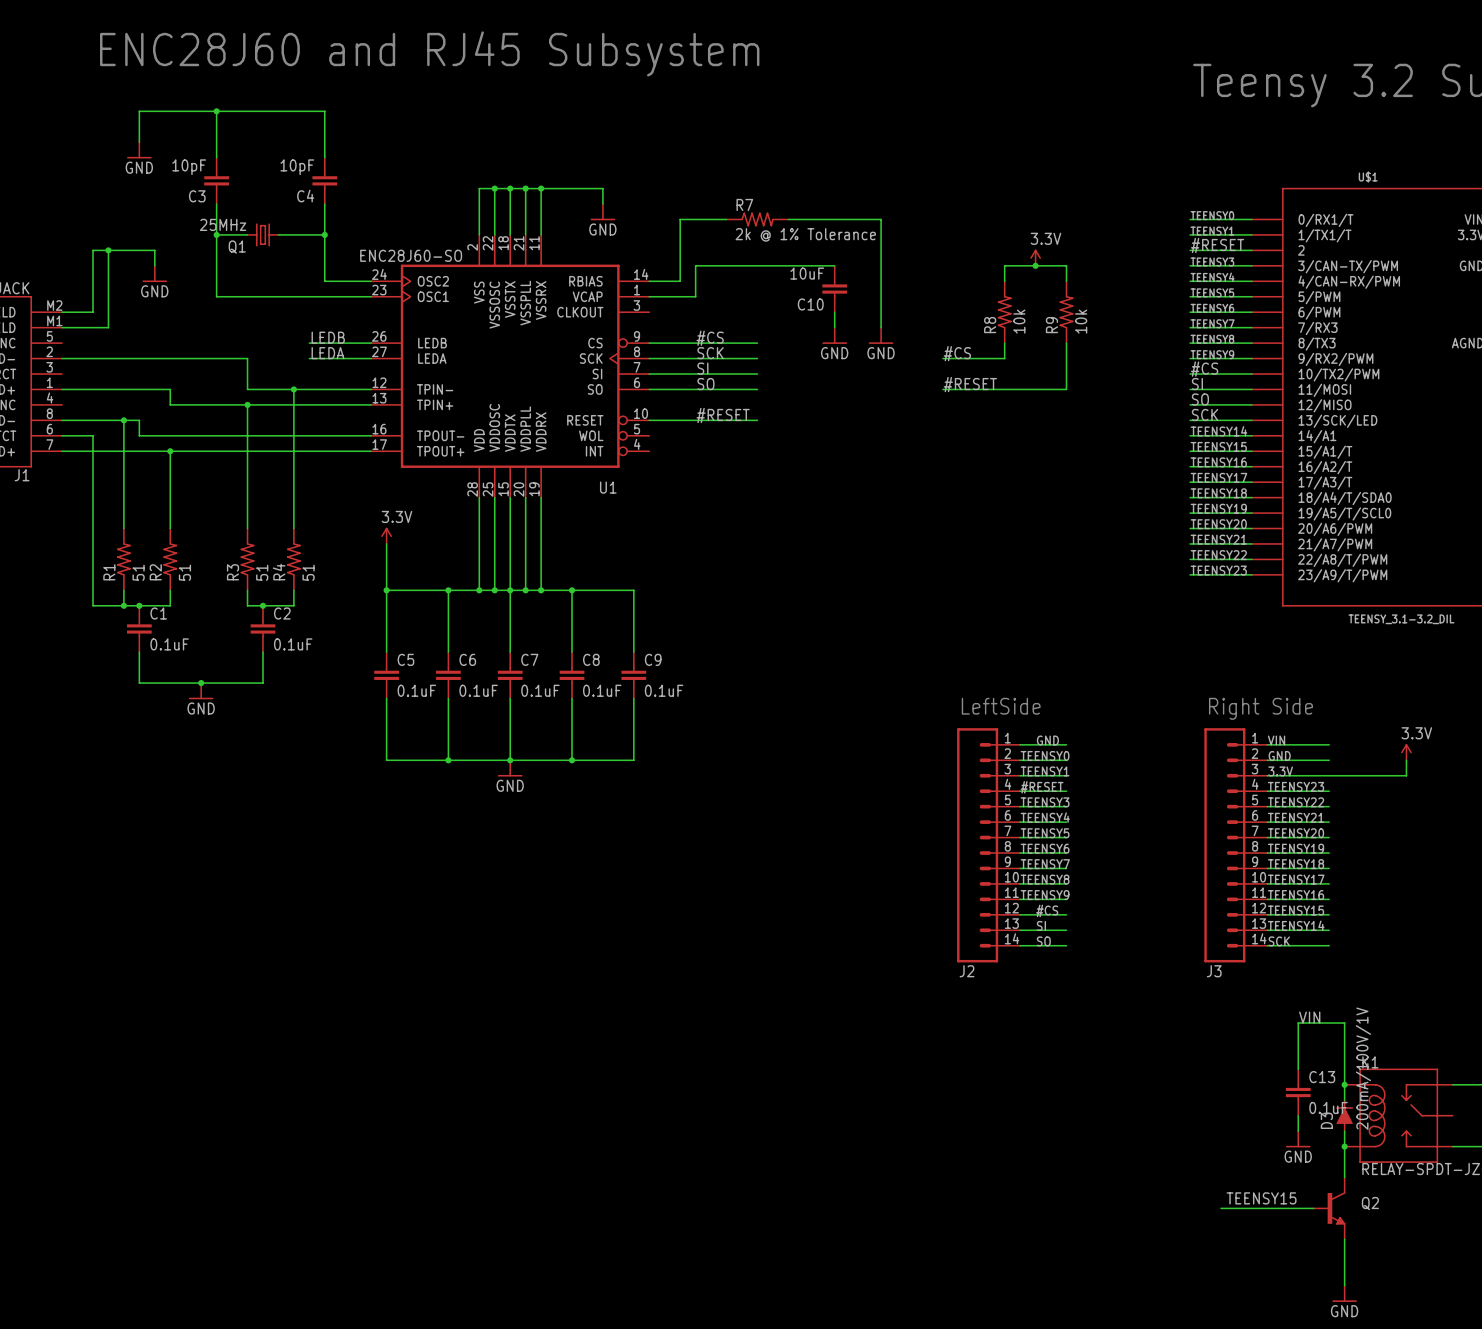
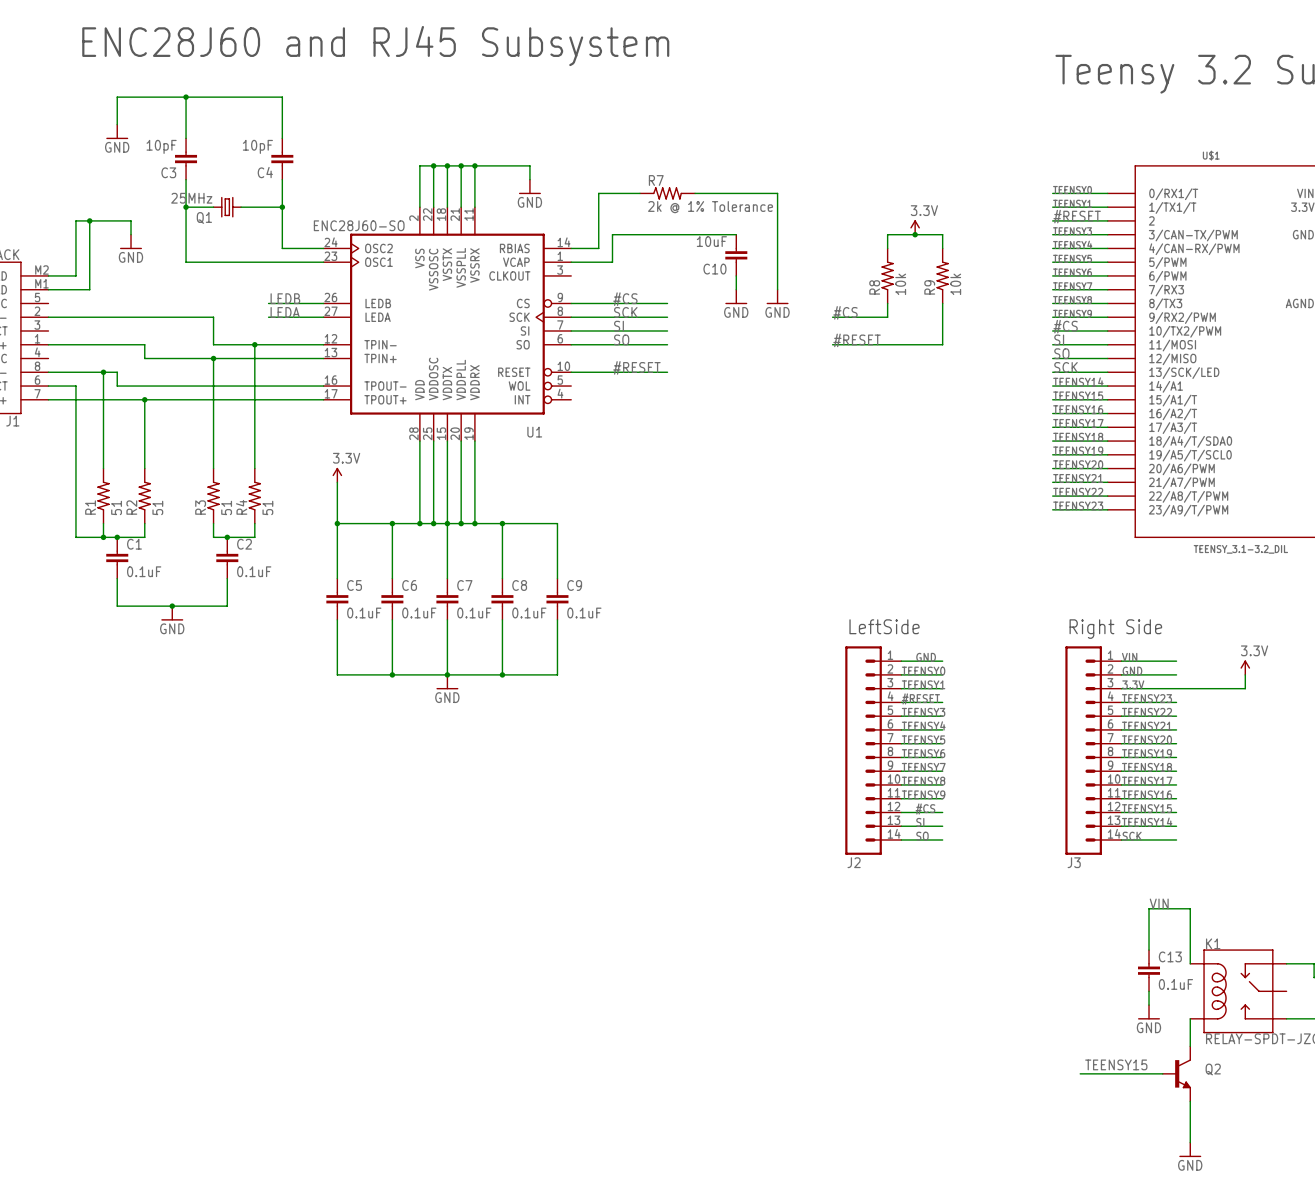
wire: (1344, 1084) (1344, 1100) -> none
junction: (1344, 1084) -> none
D3: 200mA/100V/1V (1344, 1115) -> none
wire: (1344, 1131) (1344, 1146) -> none
junction: (1344, 1146) -> none

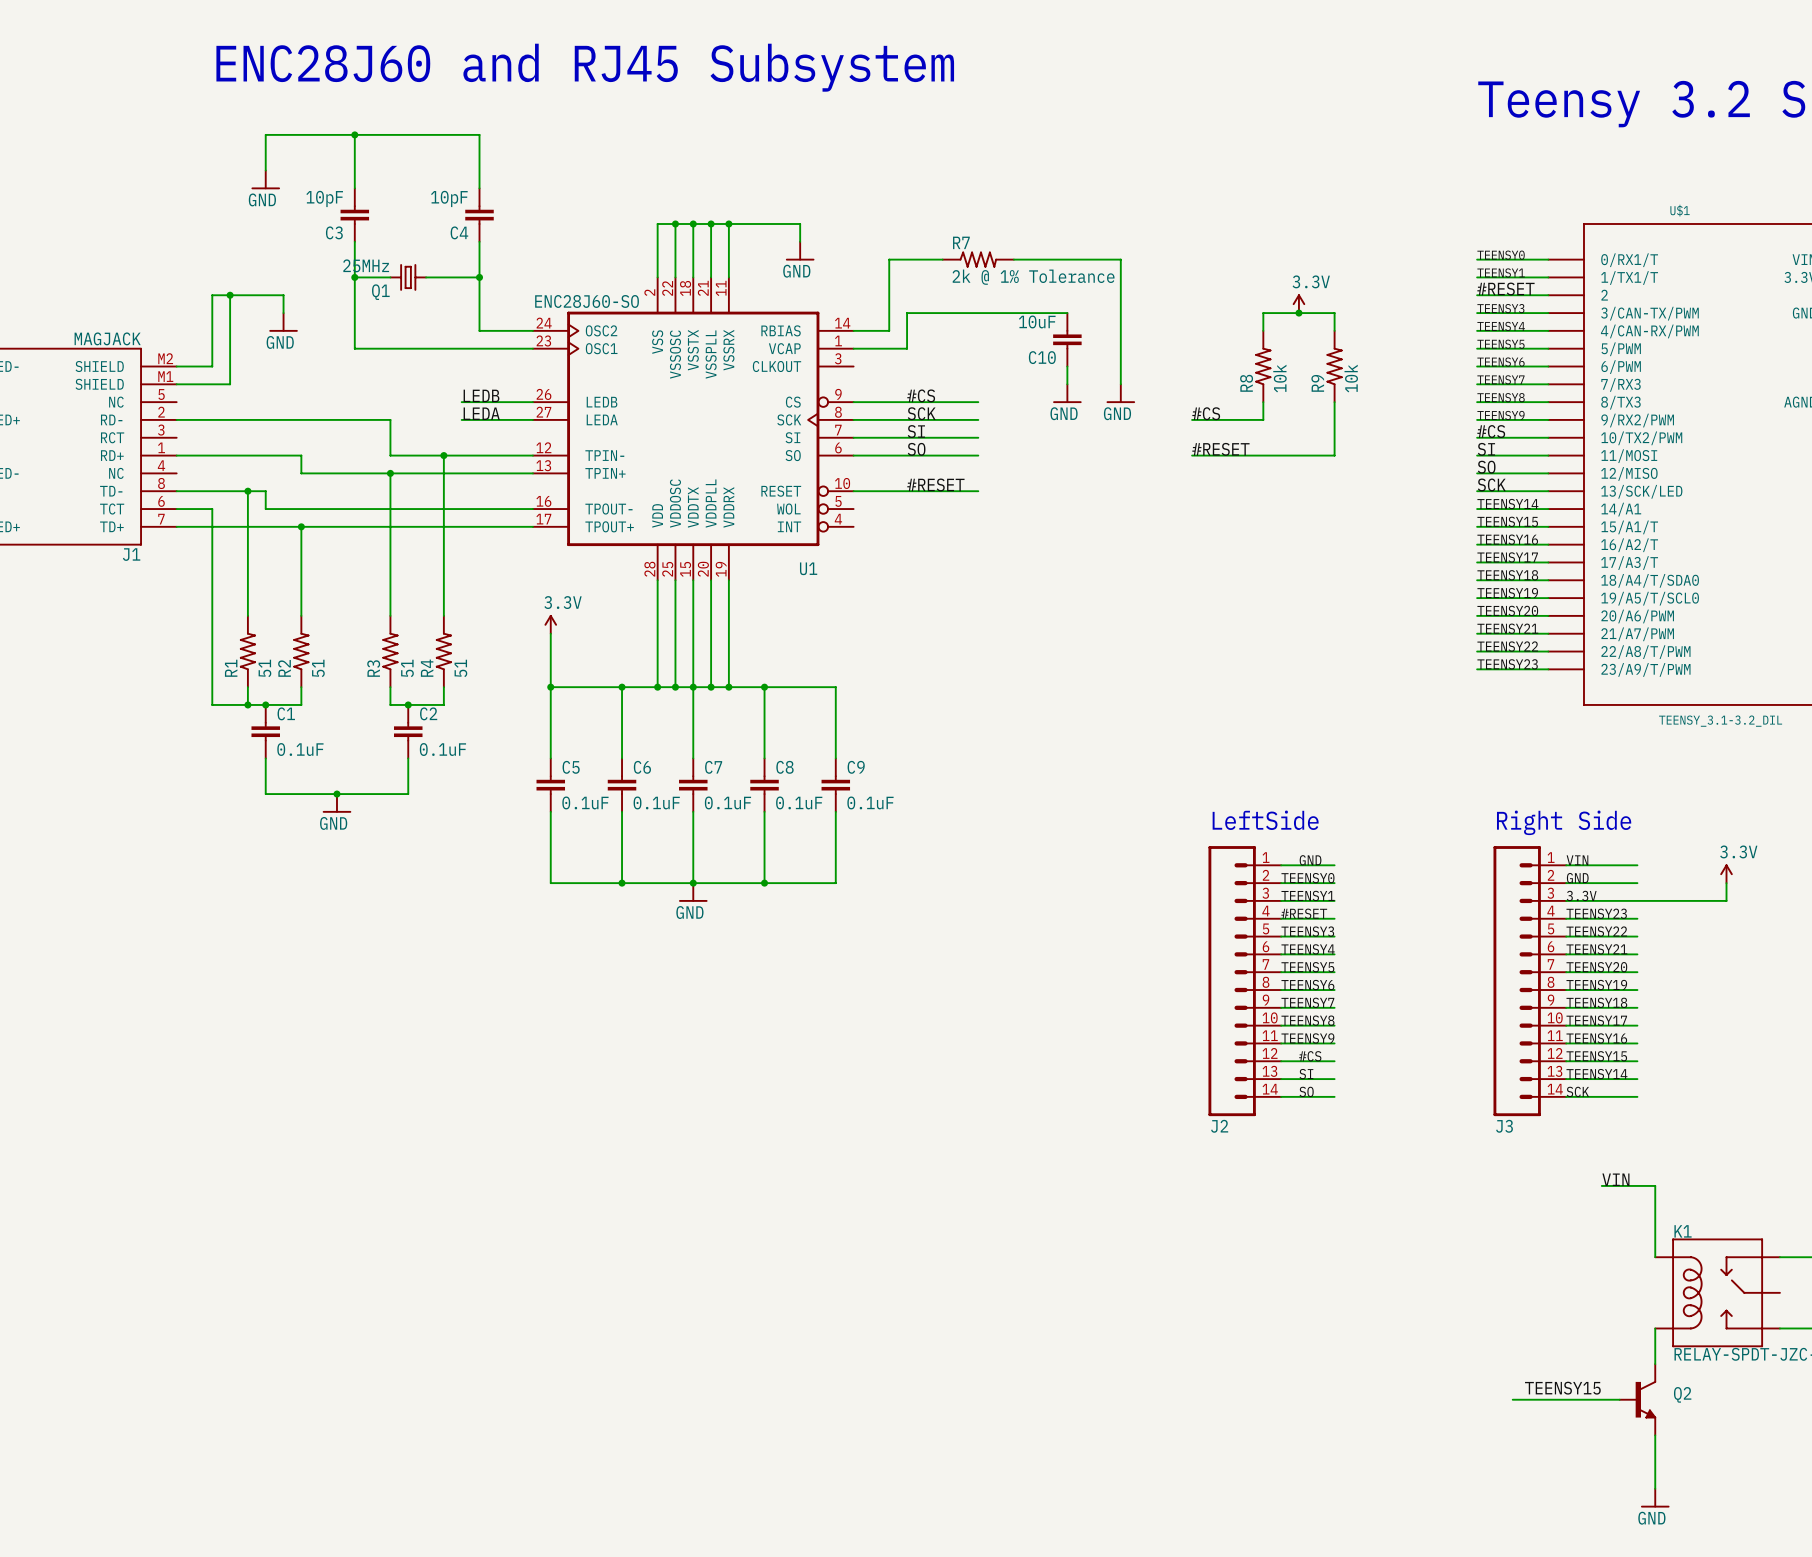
wire: (1149, 908) (1149, 950) -> none
C13: 0.1uF (1149, 970) -> none
wire: (1149, 991) (1149, 1005) -> none
power symbol: GND (1149, 1012) -> none

